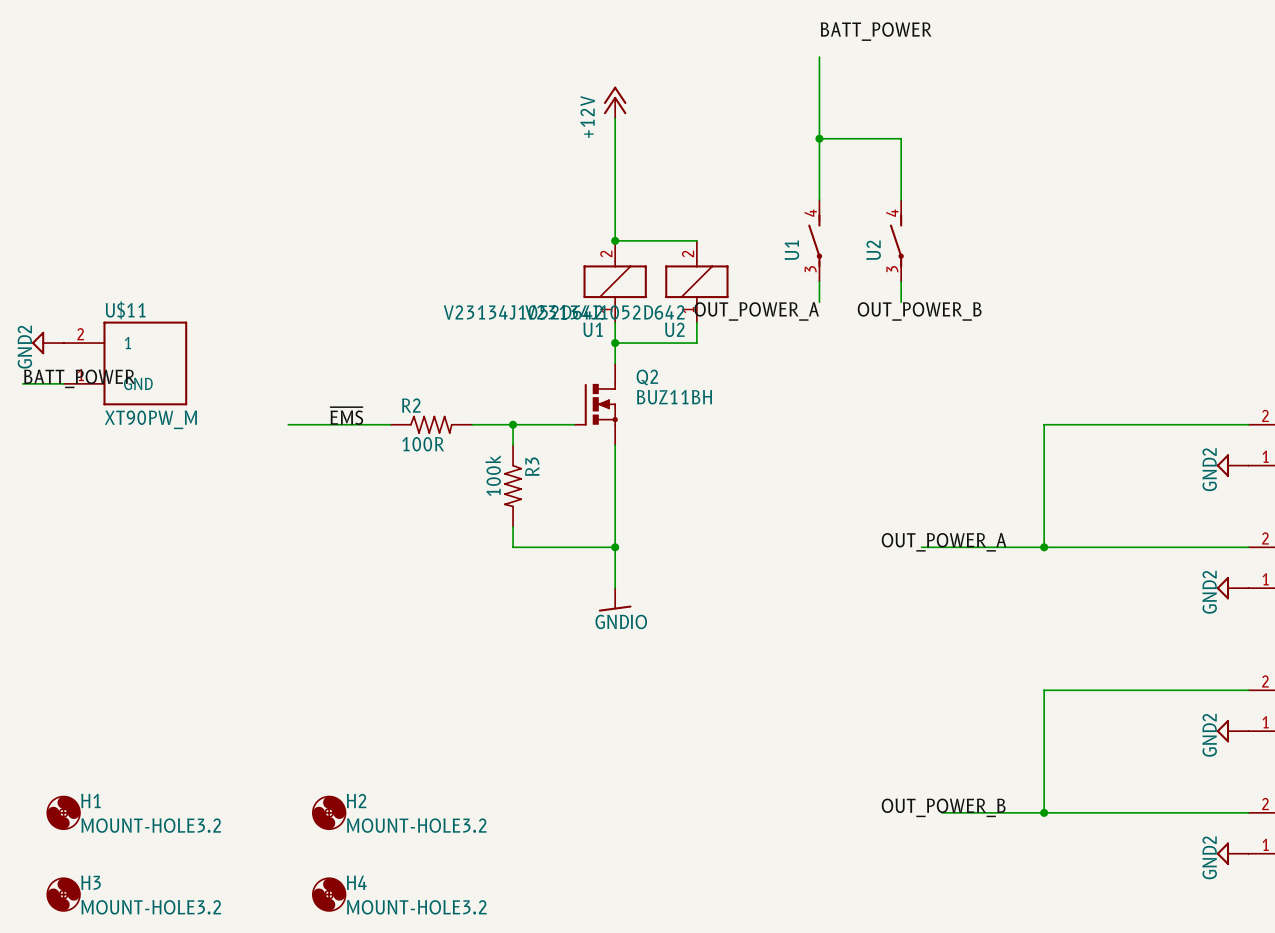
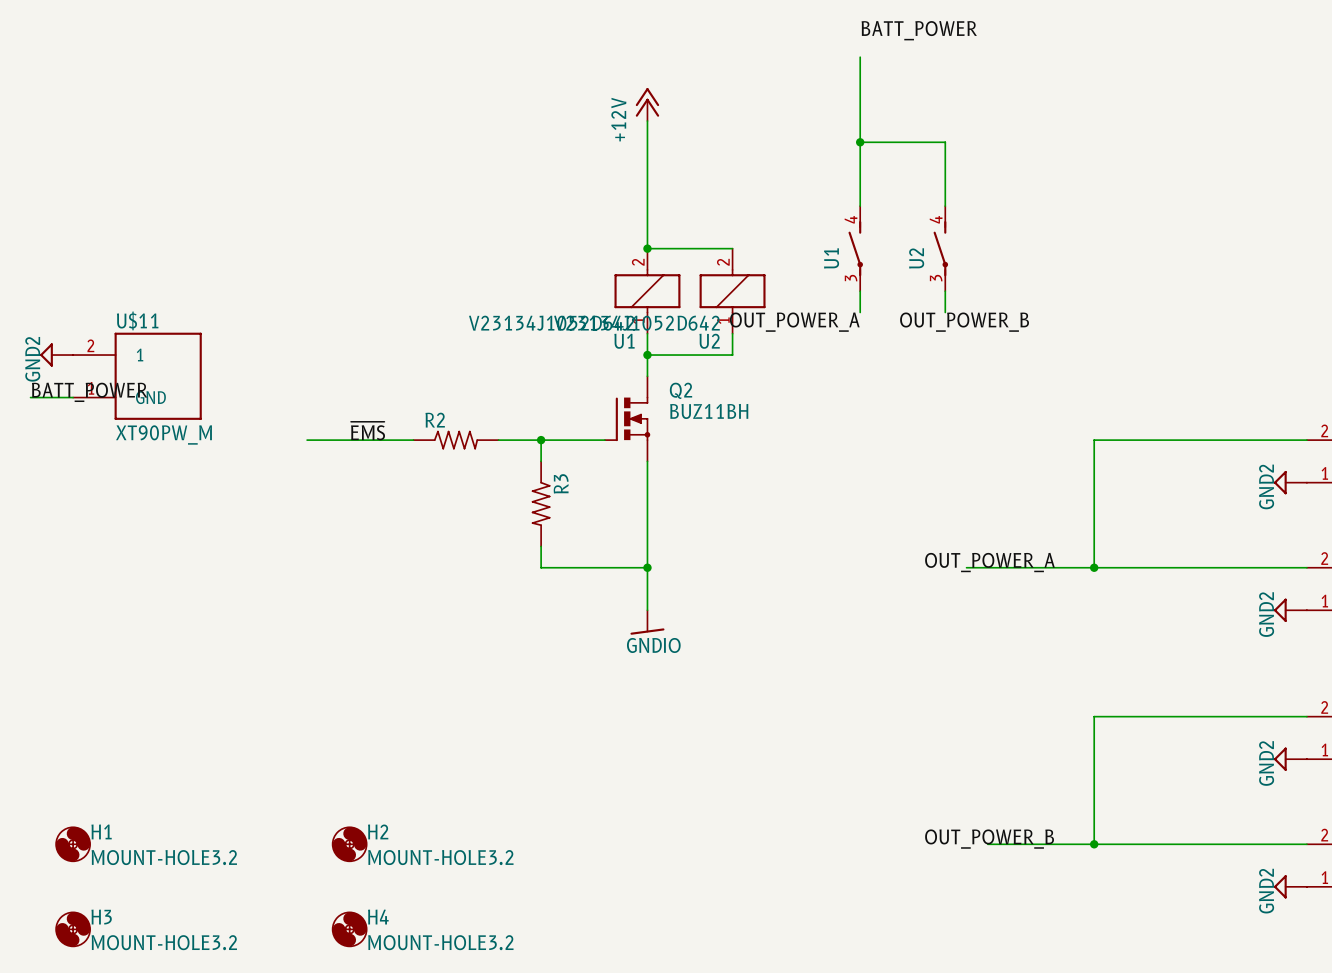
R2 value: 100R (423, 444) -> none
R3 value: 100k (493, 475) -> none

